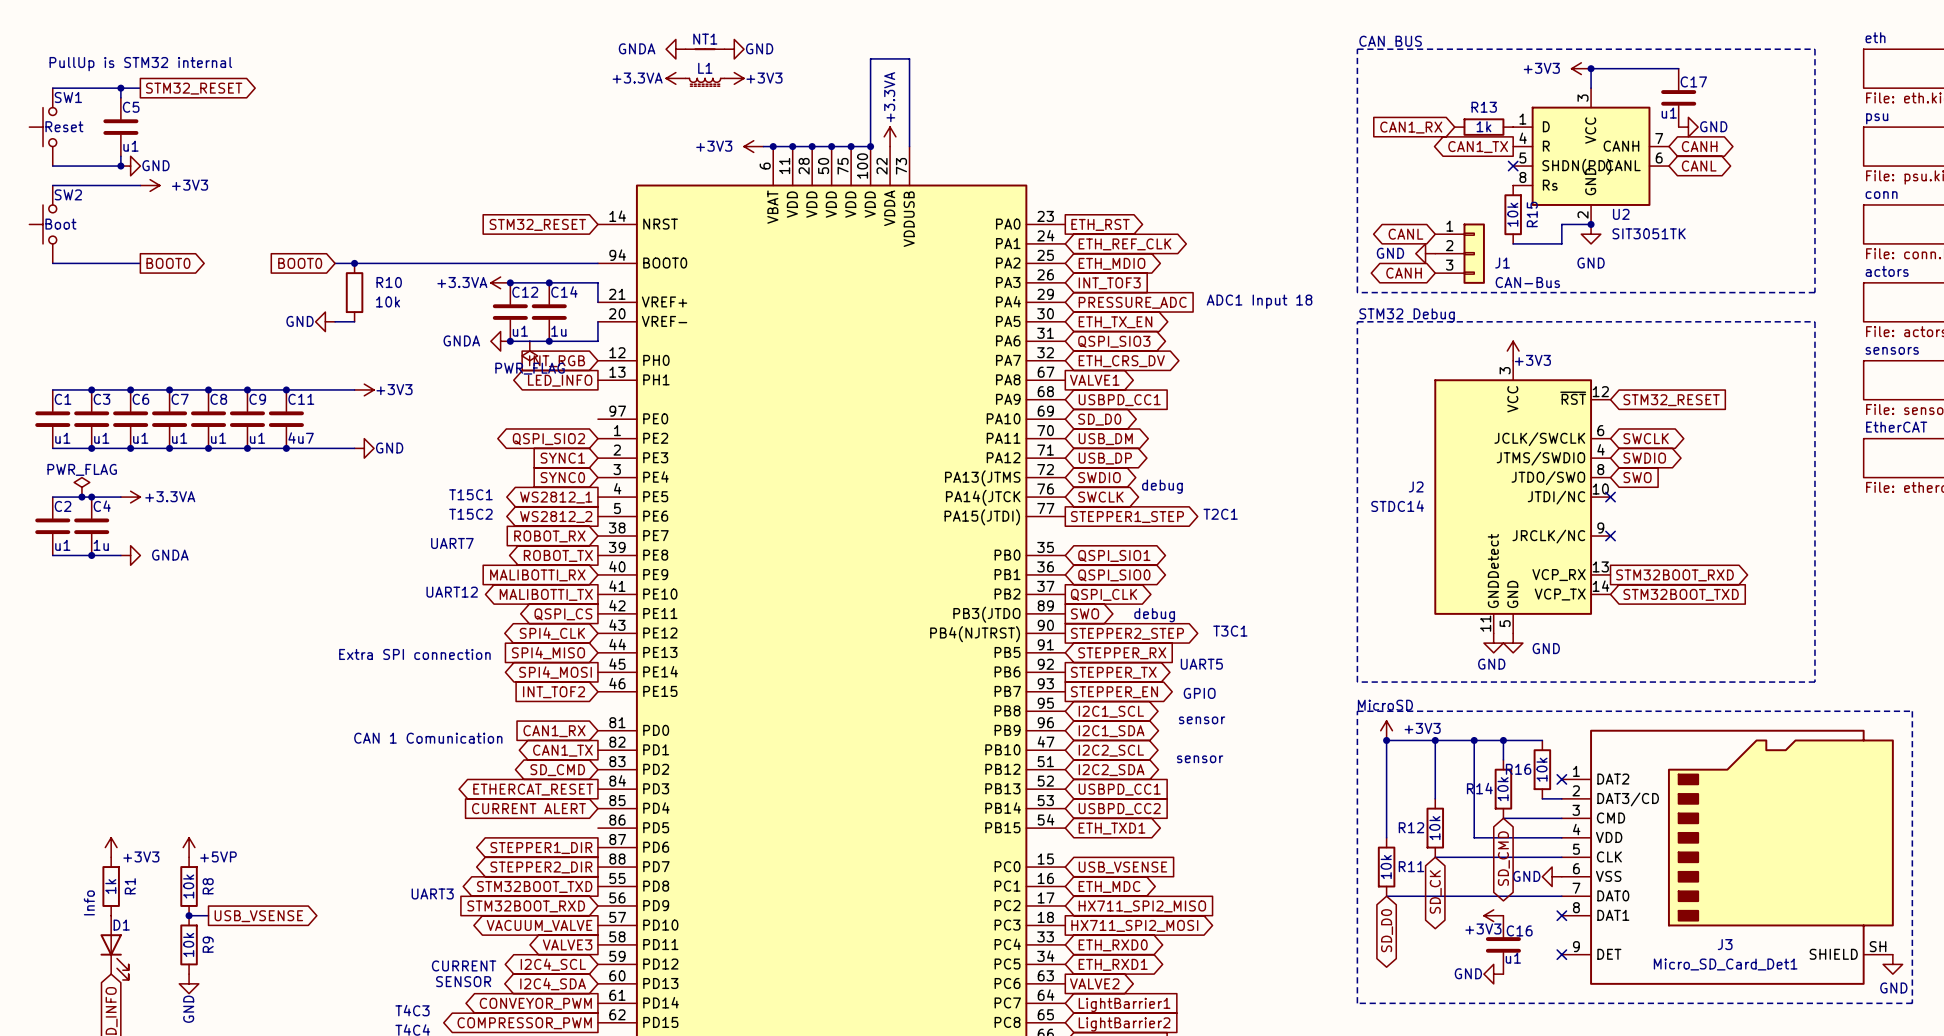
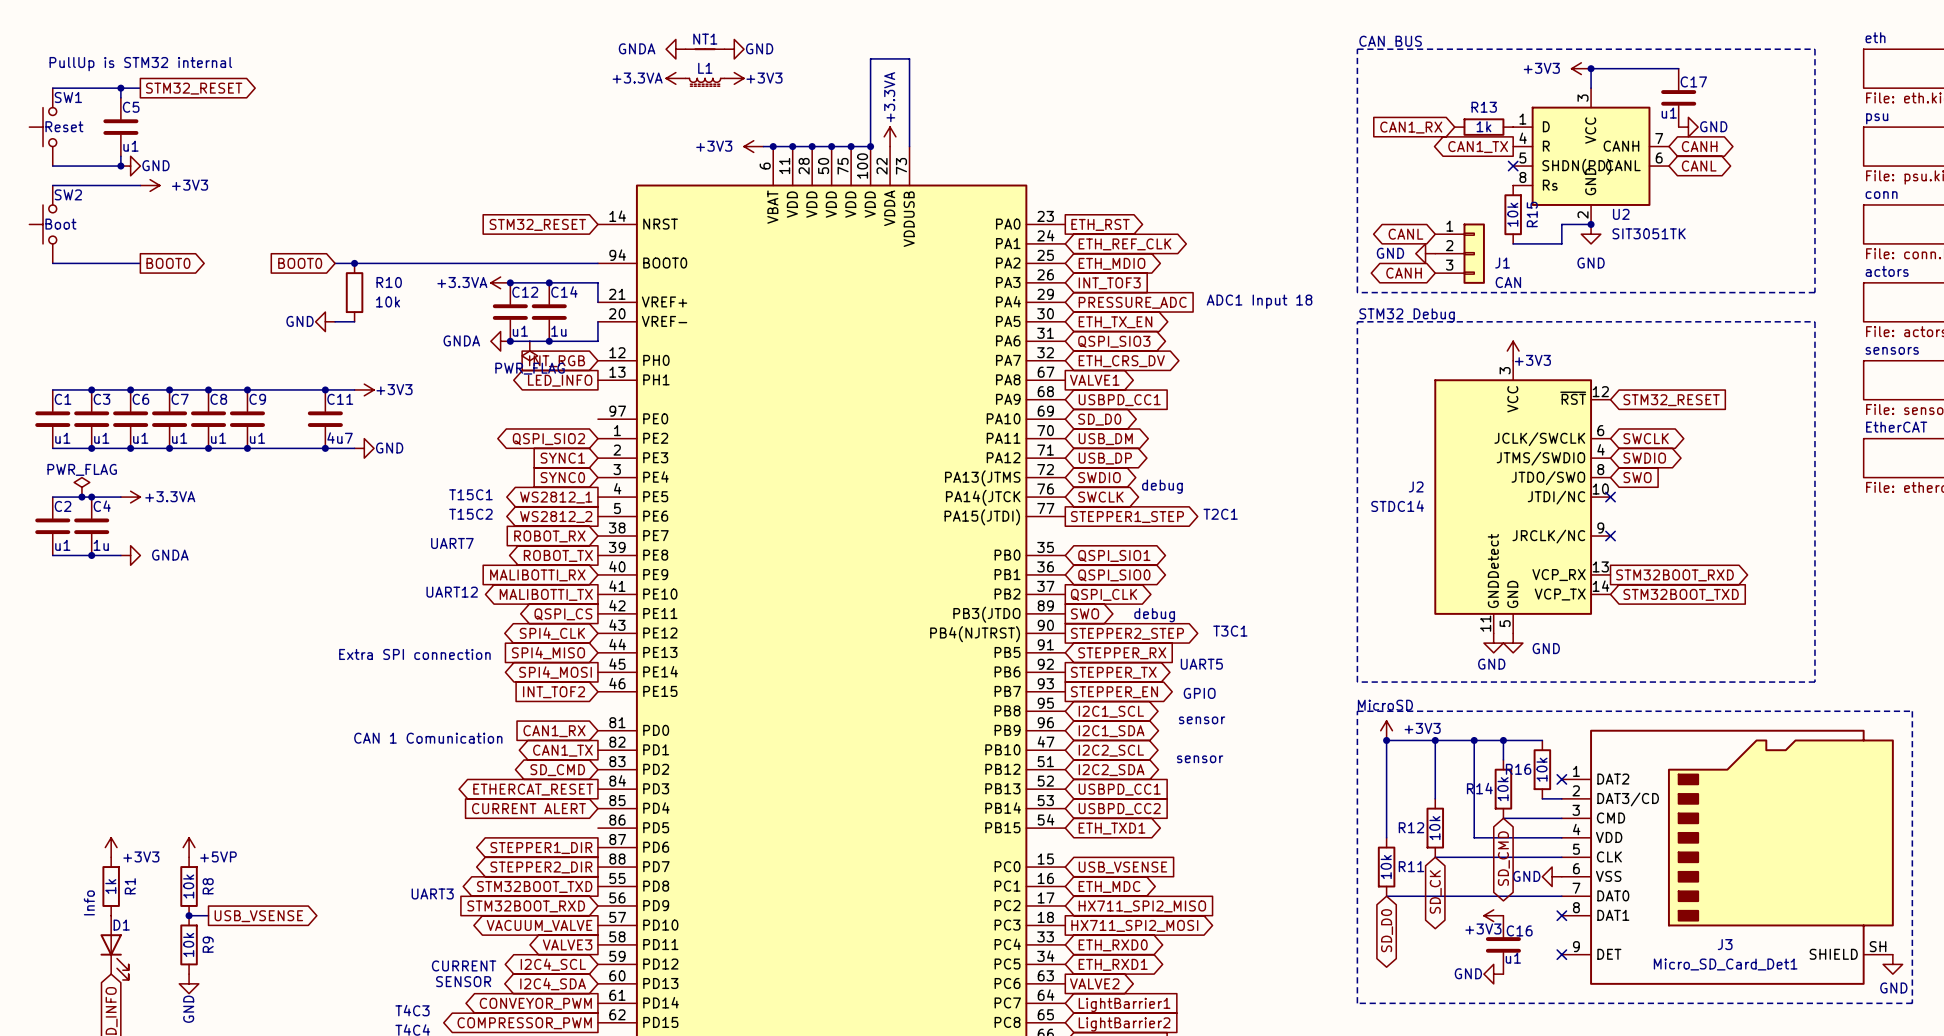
J1 value: CAN-Bus (1527, 282) -> CAN (1508, 282)
junction: (286, 389) -> none
junction: none -> (325, 389)
C11 position: (286, 419) -> (325, 419)
junction: (286, 448) -> none
junction: none -> (325, 448)

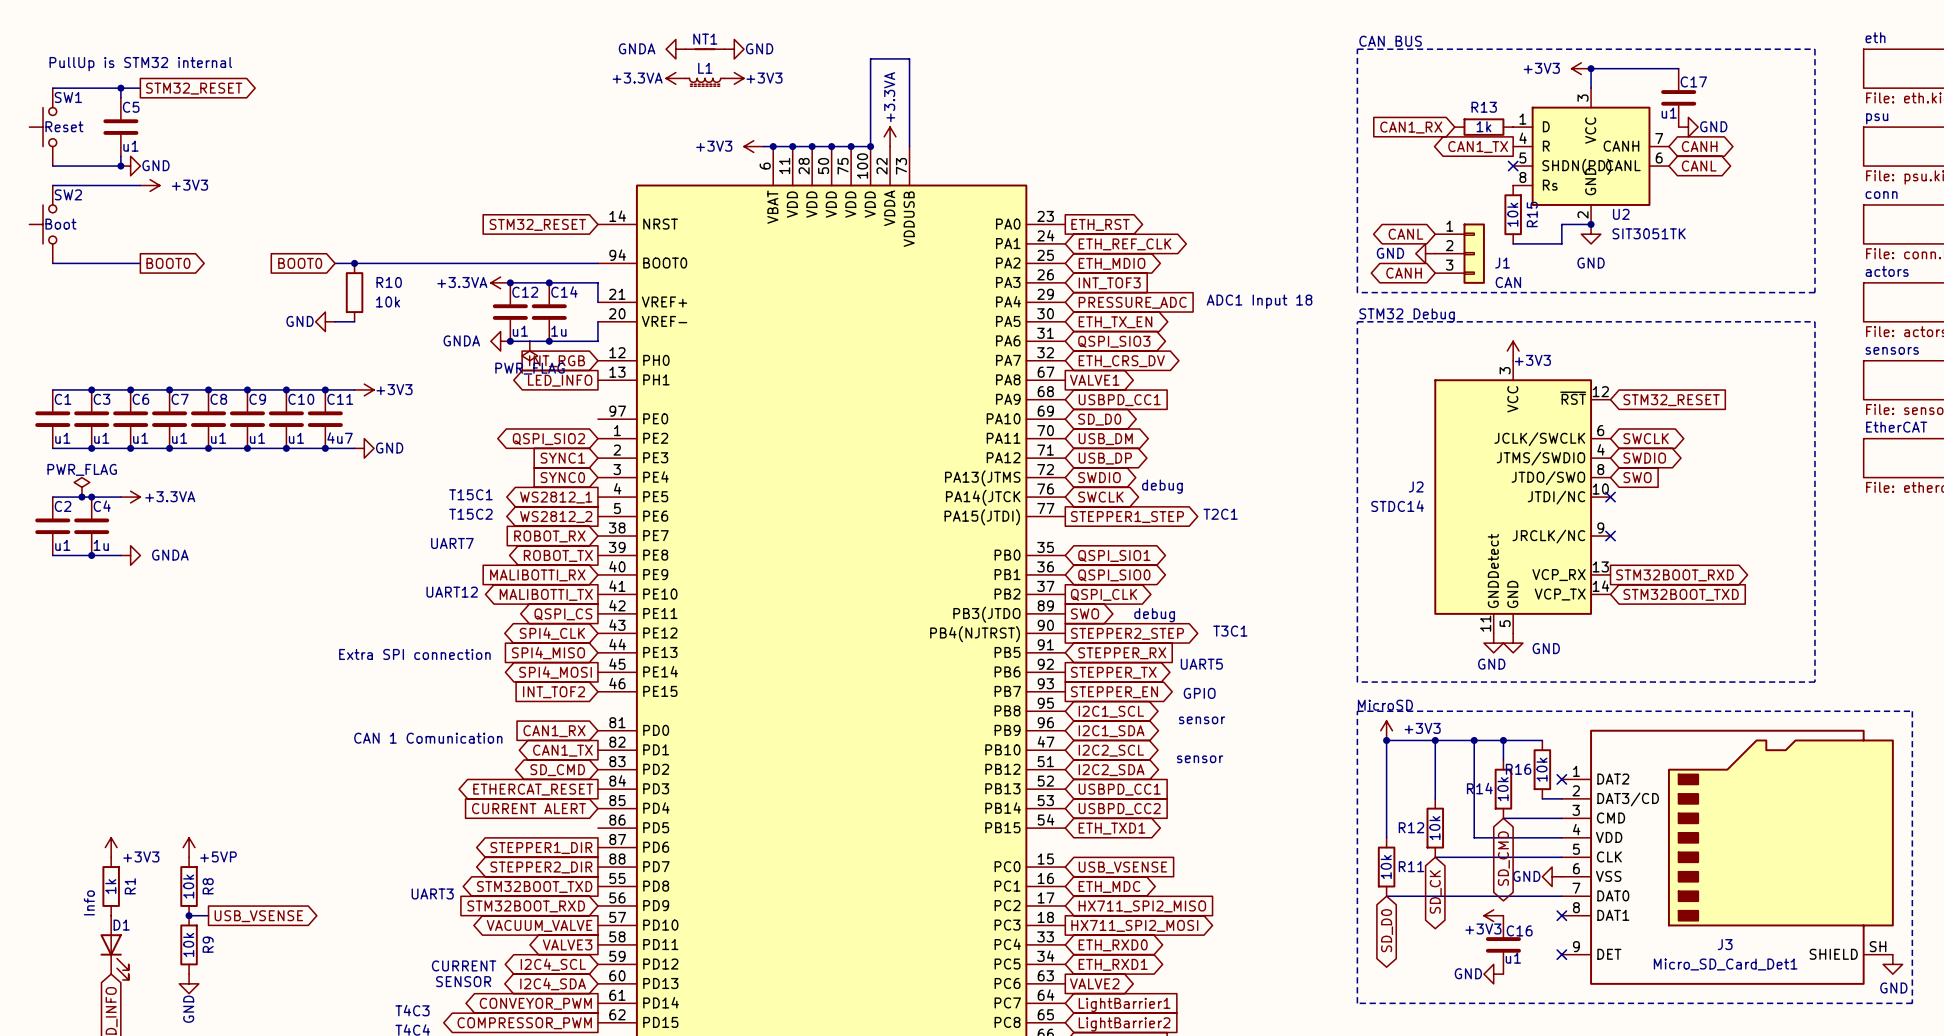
junction: none -> (286, 389)
C10: none -> u1 (286, 419)
junction: none -> (286, 448)

